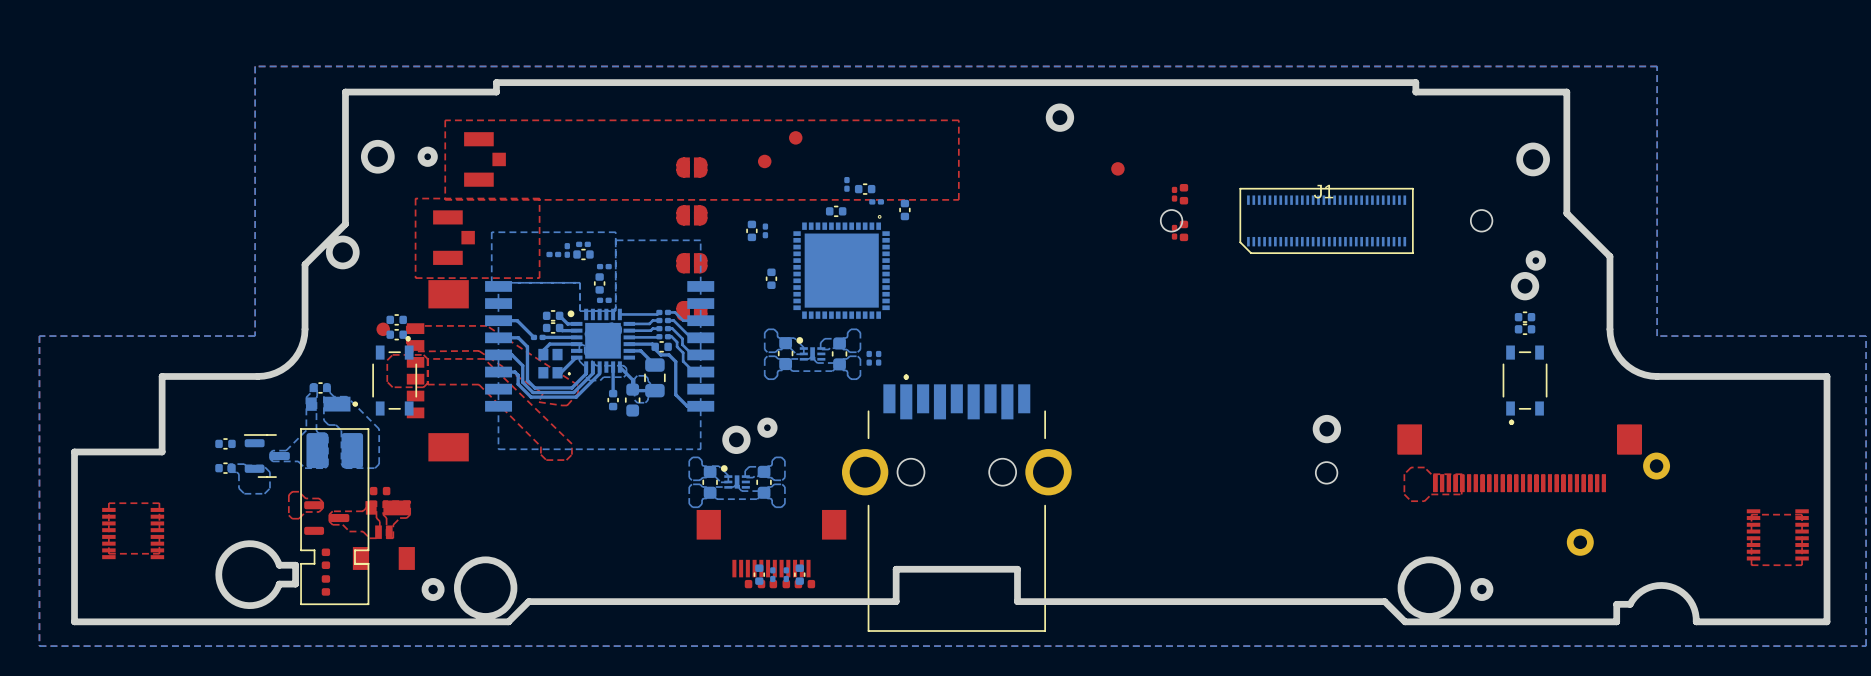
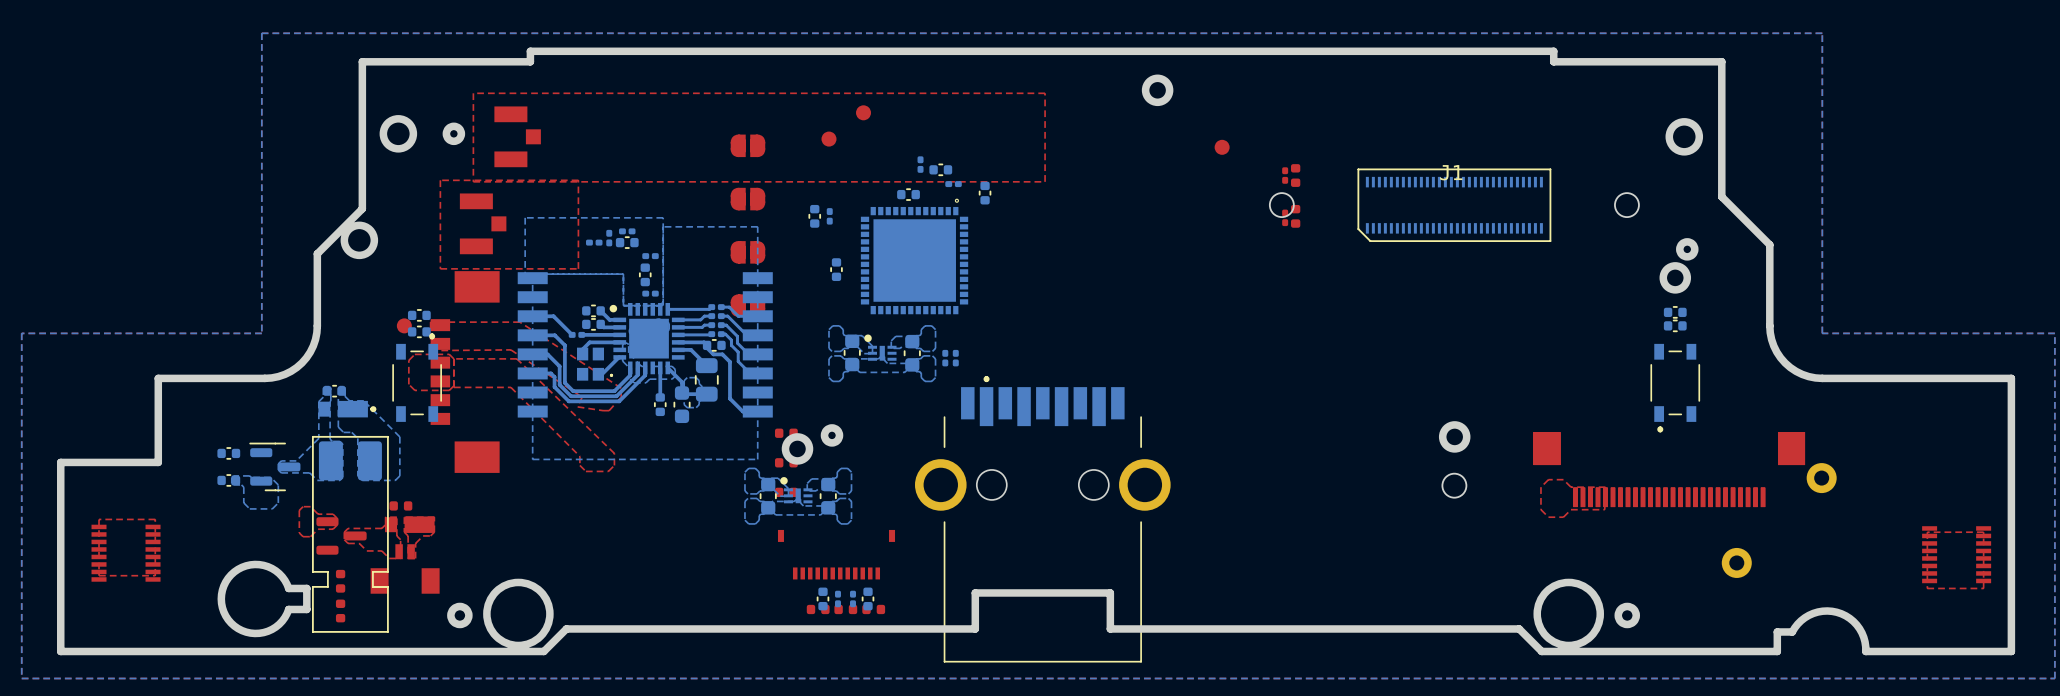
part: none -> (786, 433)
part: none -> (786, 462)
part: none -> (786, 492)
part footprint: [696, 509, 847, 578] -> [777, 529, 896, 580]

